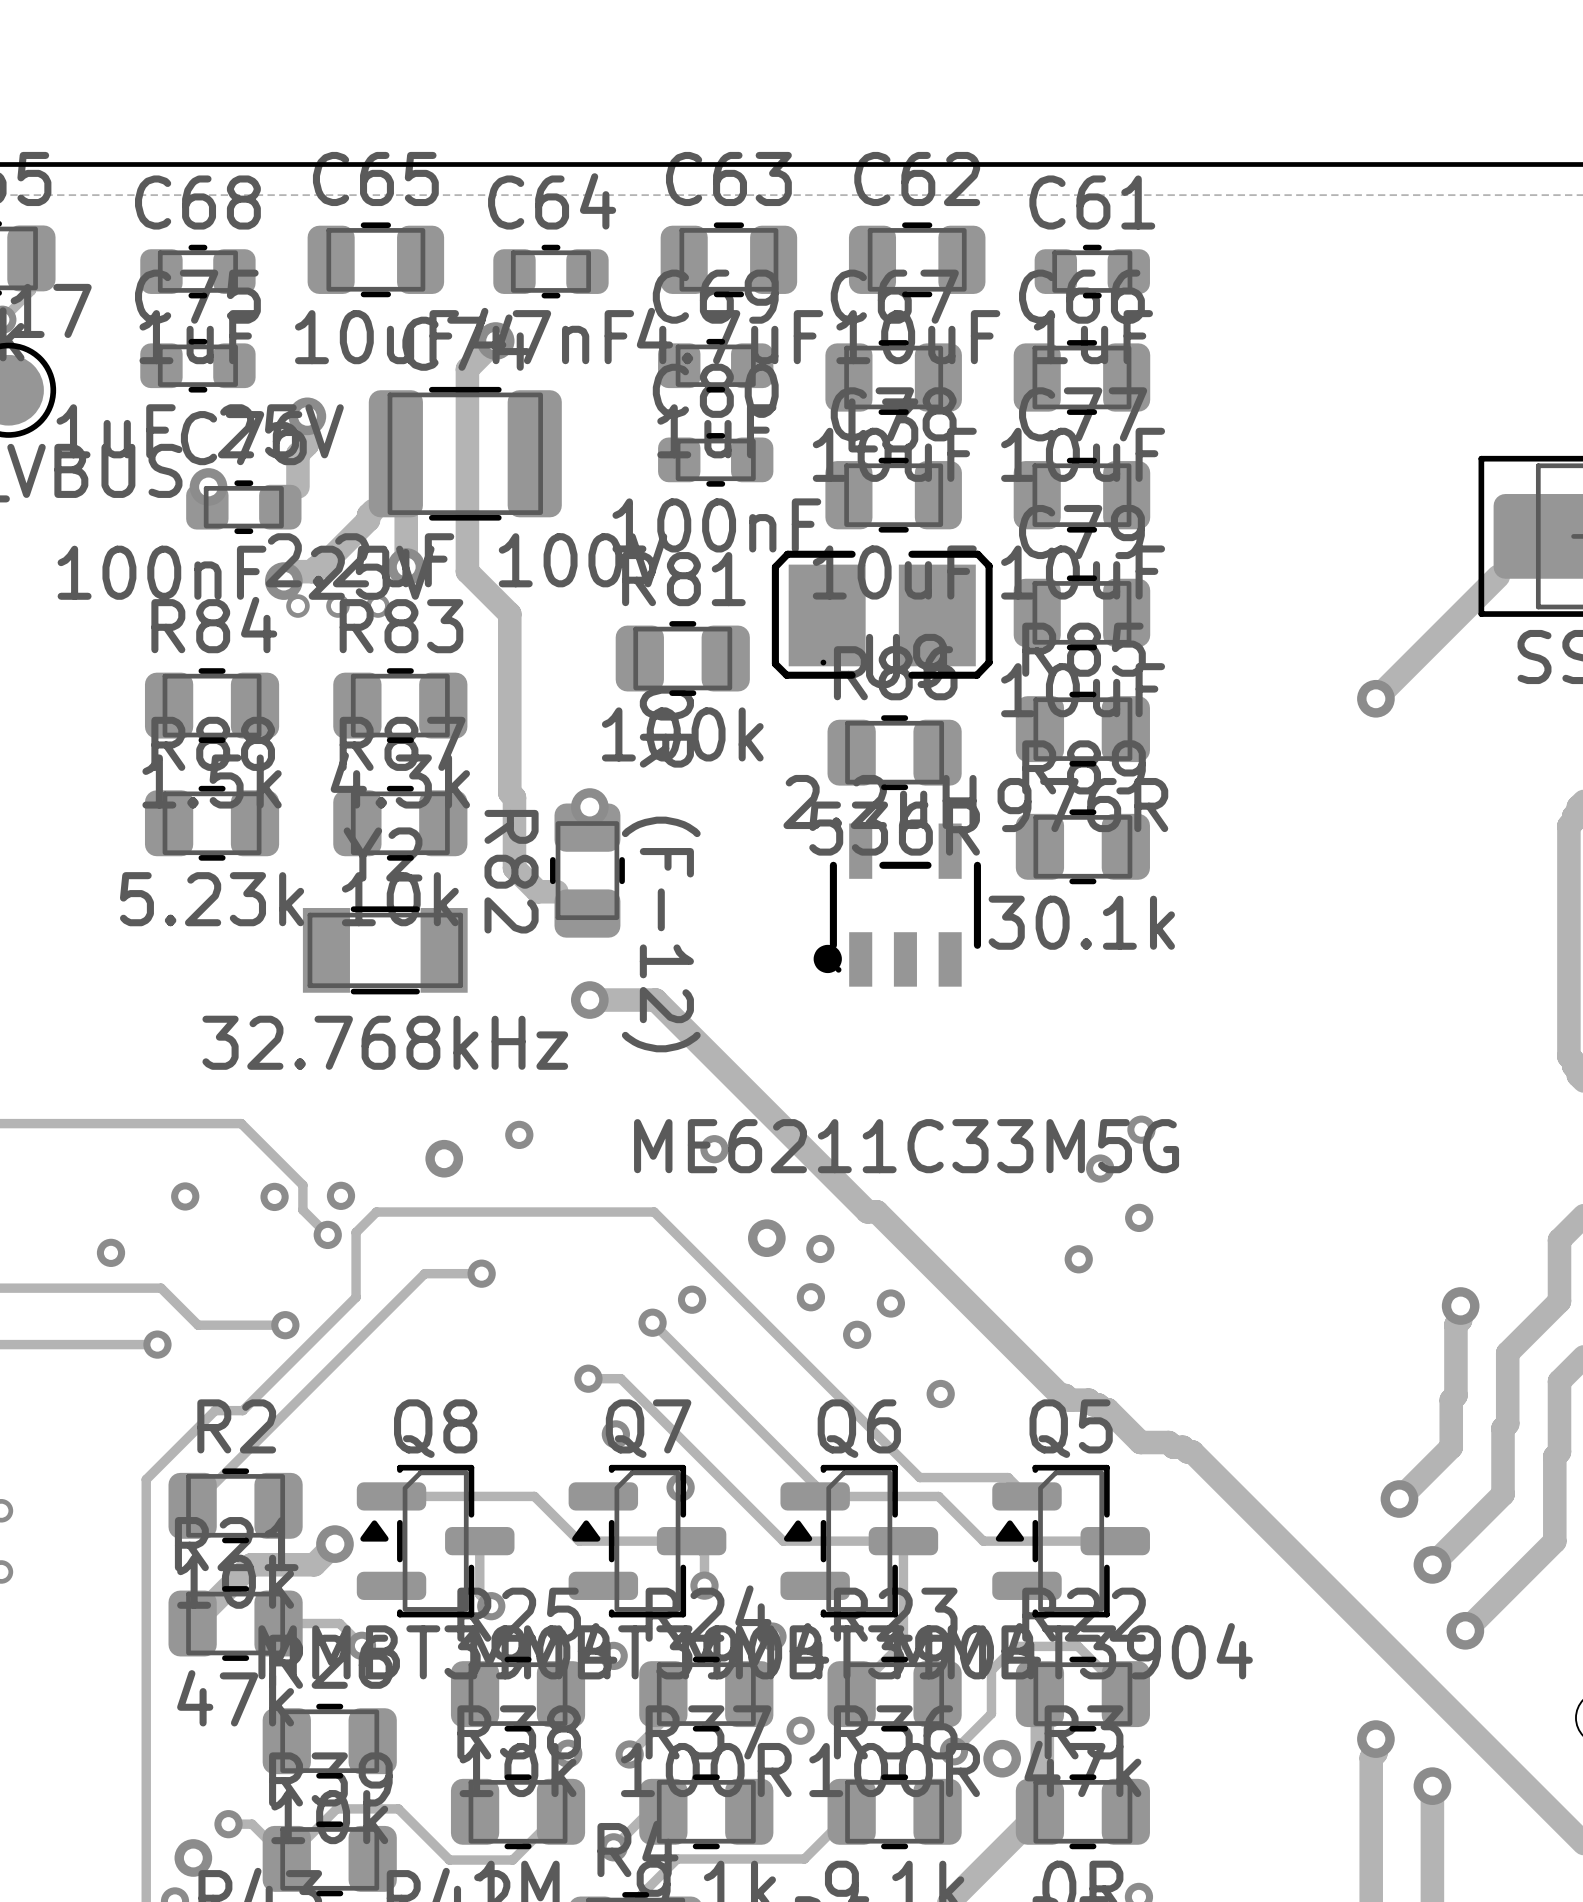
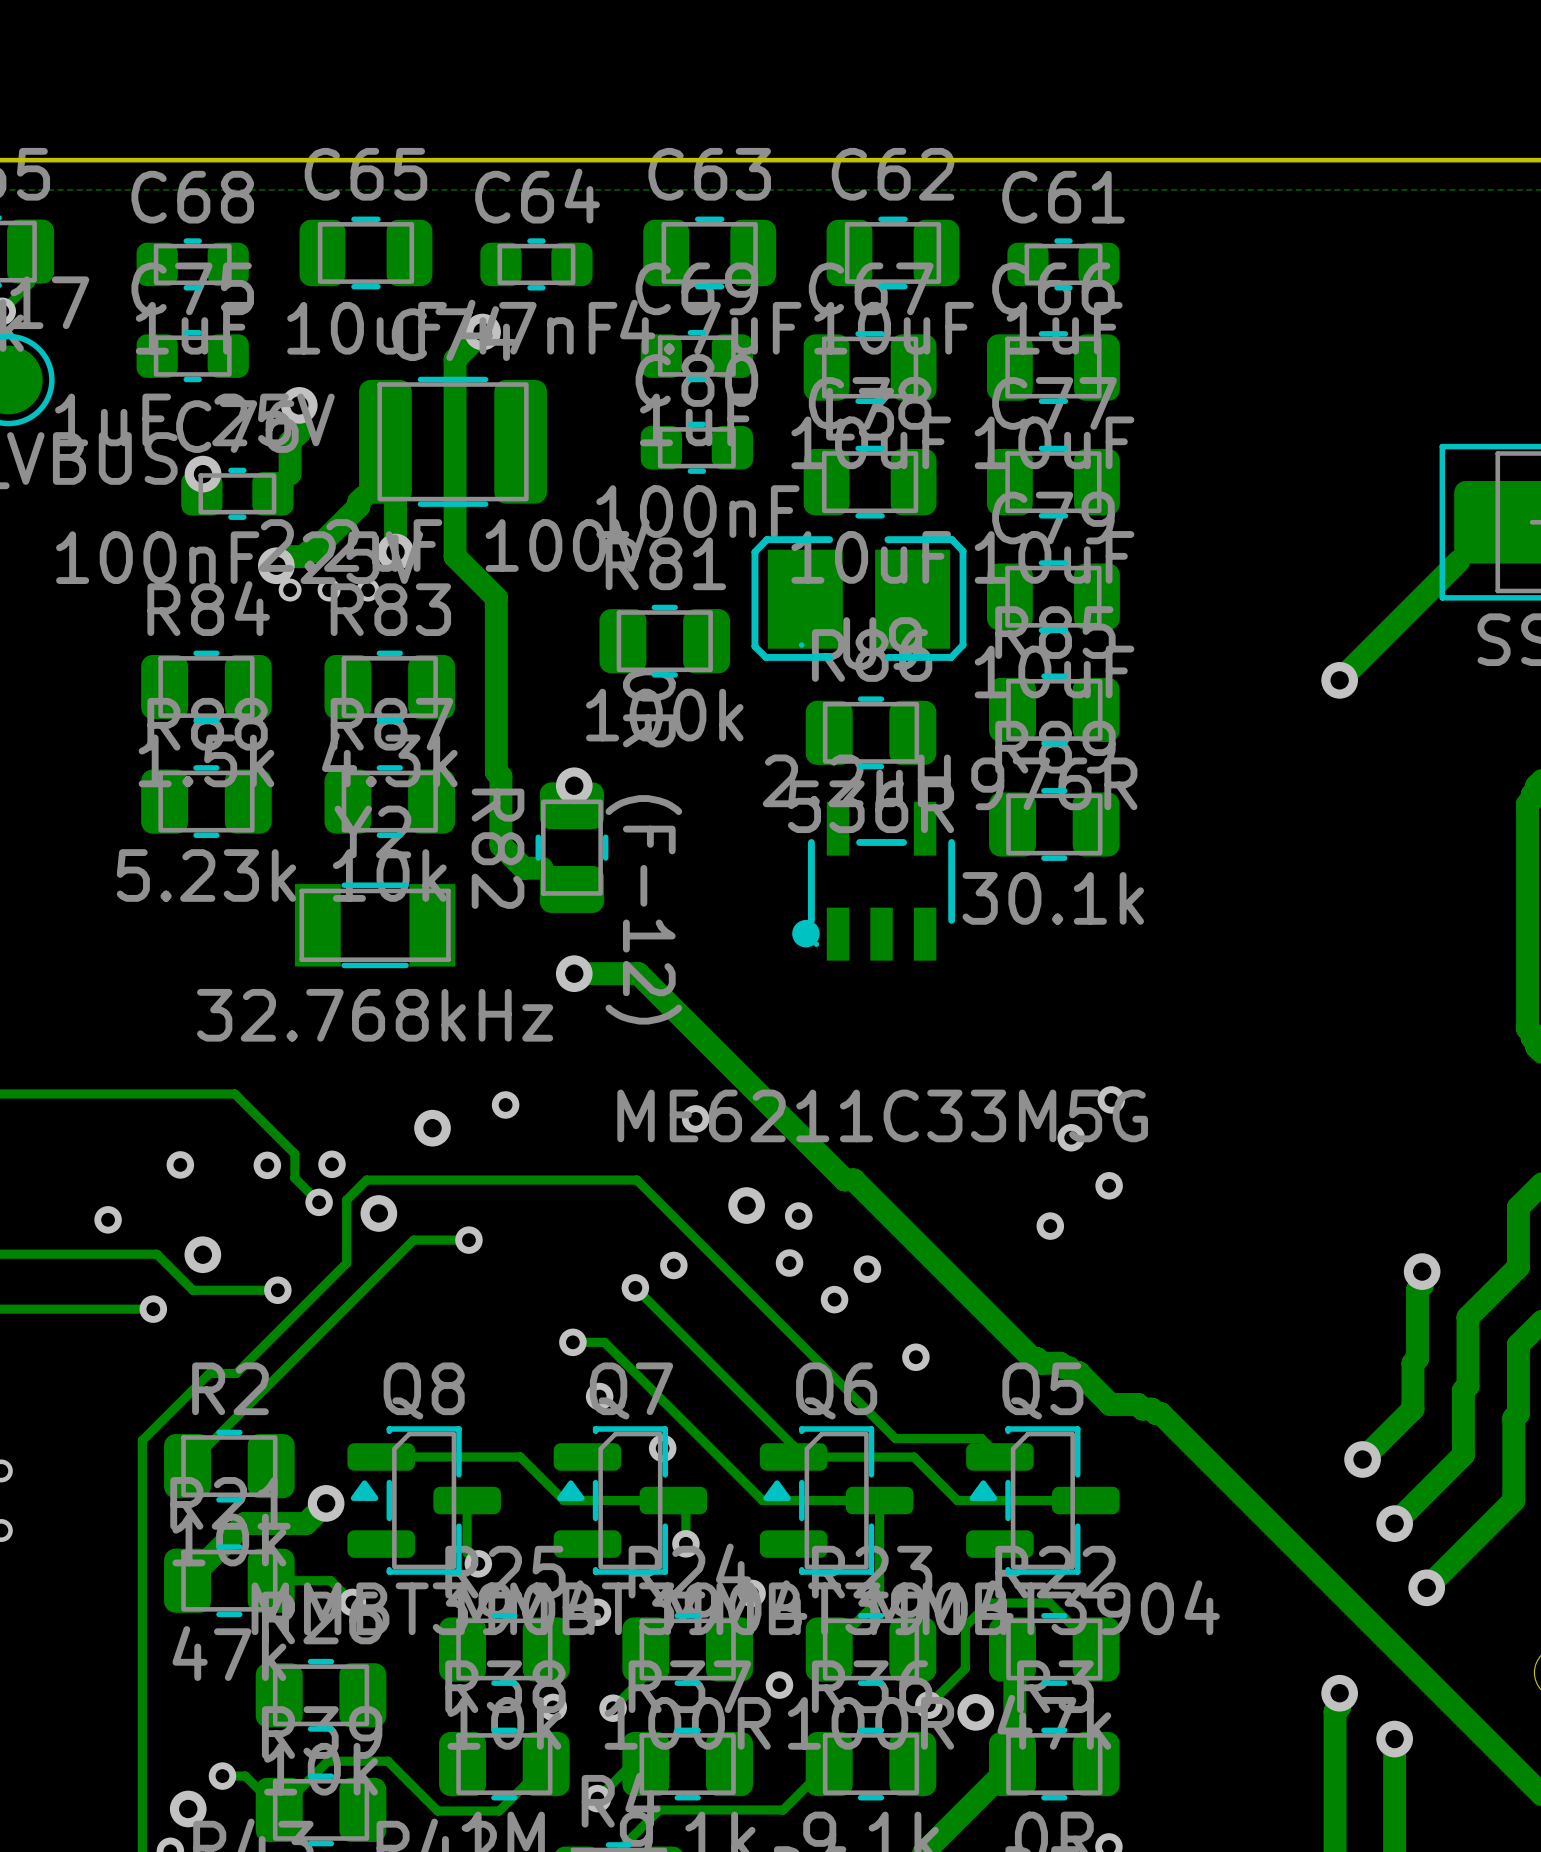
via: none -> (378, 1213)
via: none -> (202, 1254)

